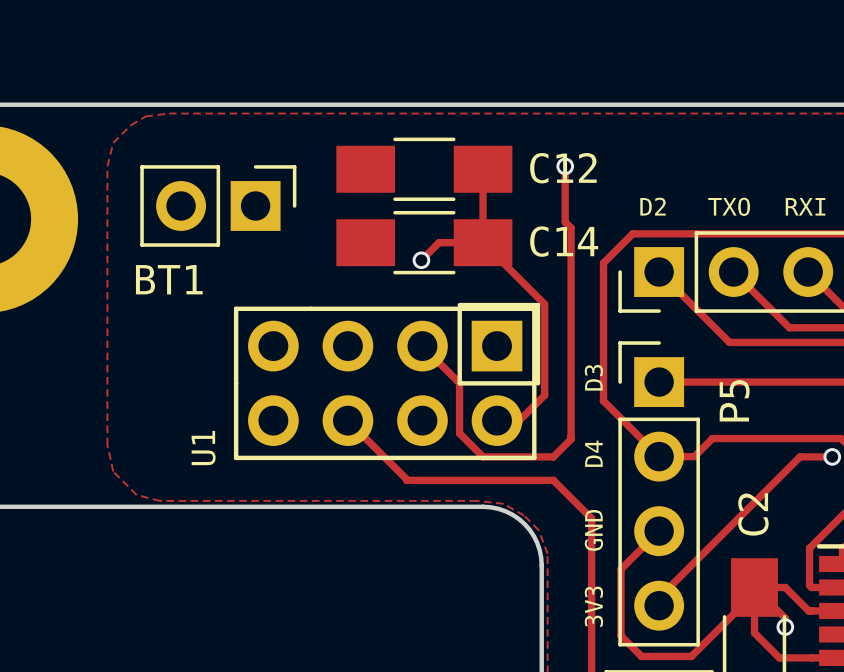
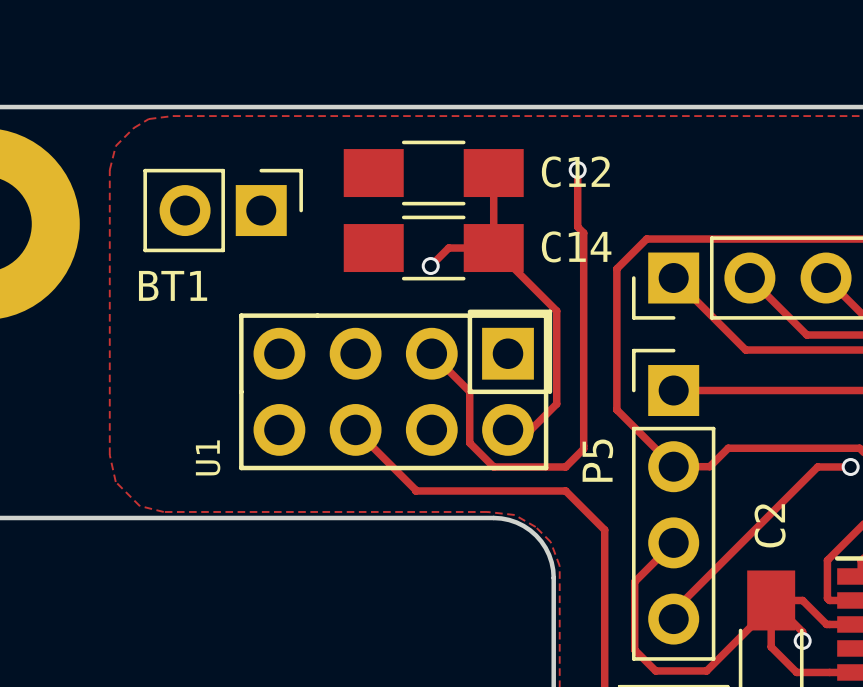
text: D2 (653, 206) -> none
text: TXO (729, 206) -> none
text: RXI (805, 206) -> none
text: D3 (593, 377) -> none
P5 name position: P5 (734, 400) -> P5 (597, 460)
text: D4 (593, 453) -> none
text: GND (593, 530) -> none
text: 3V3 (593, 606) -> none

